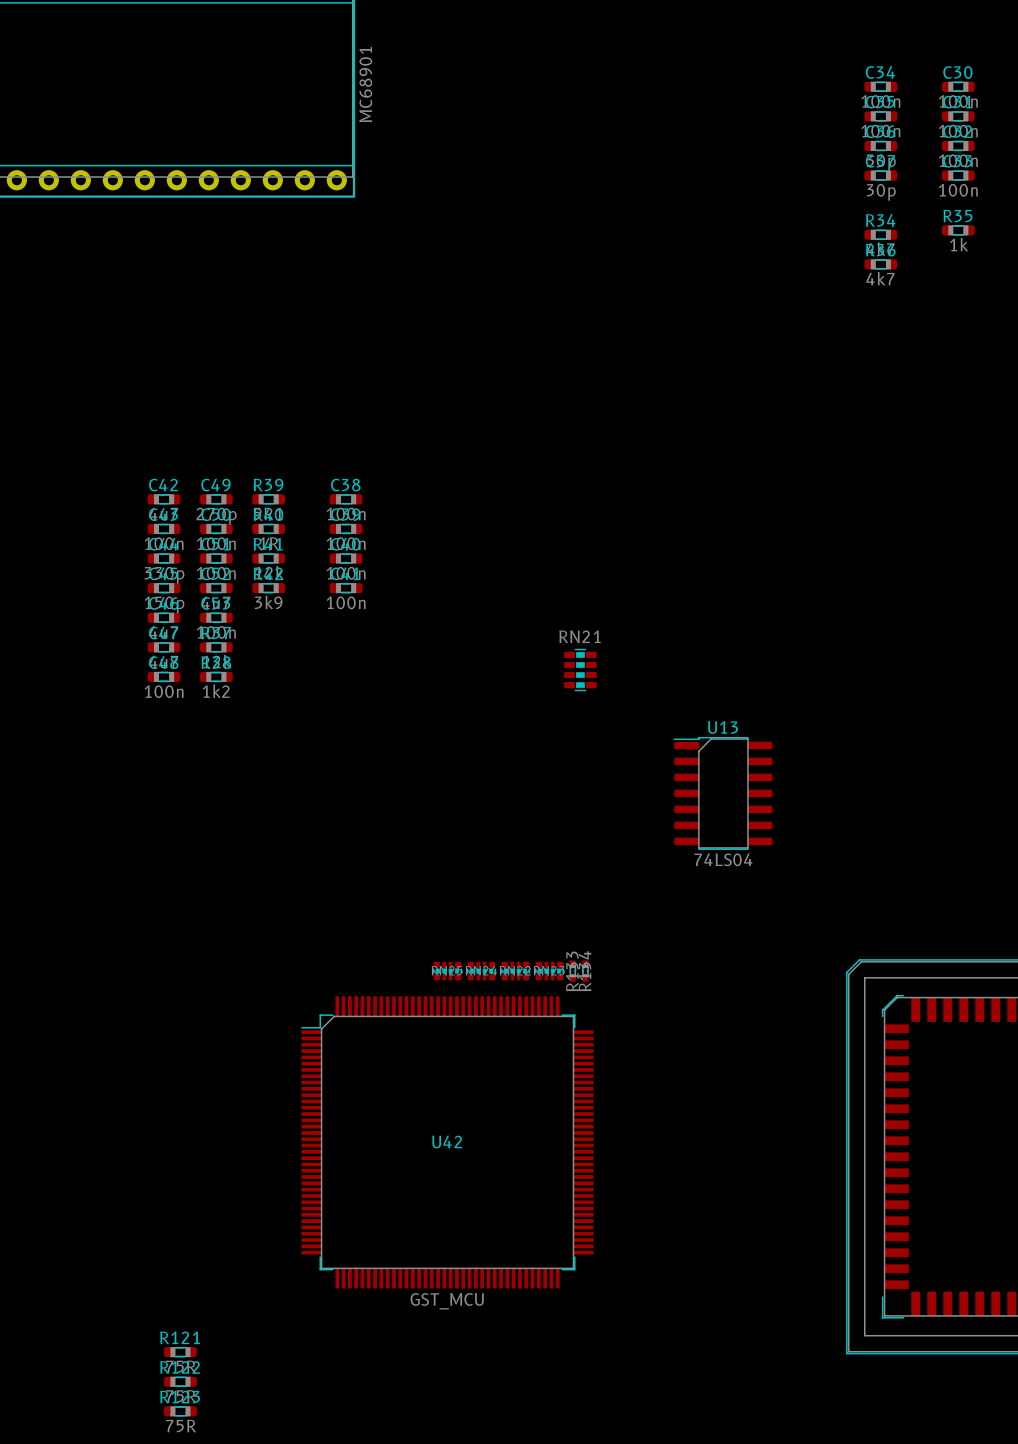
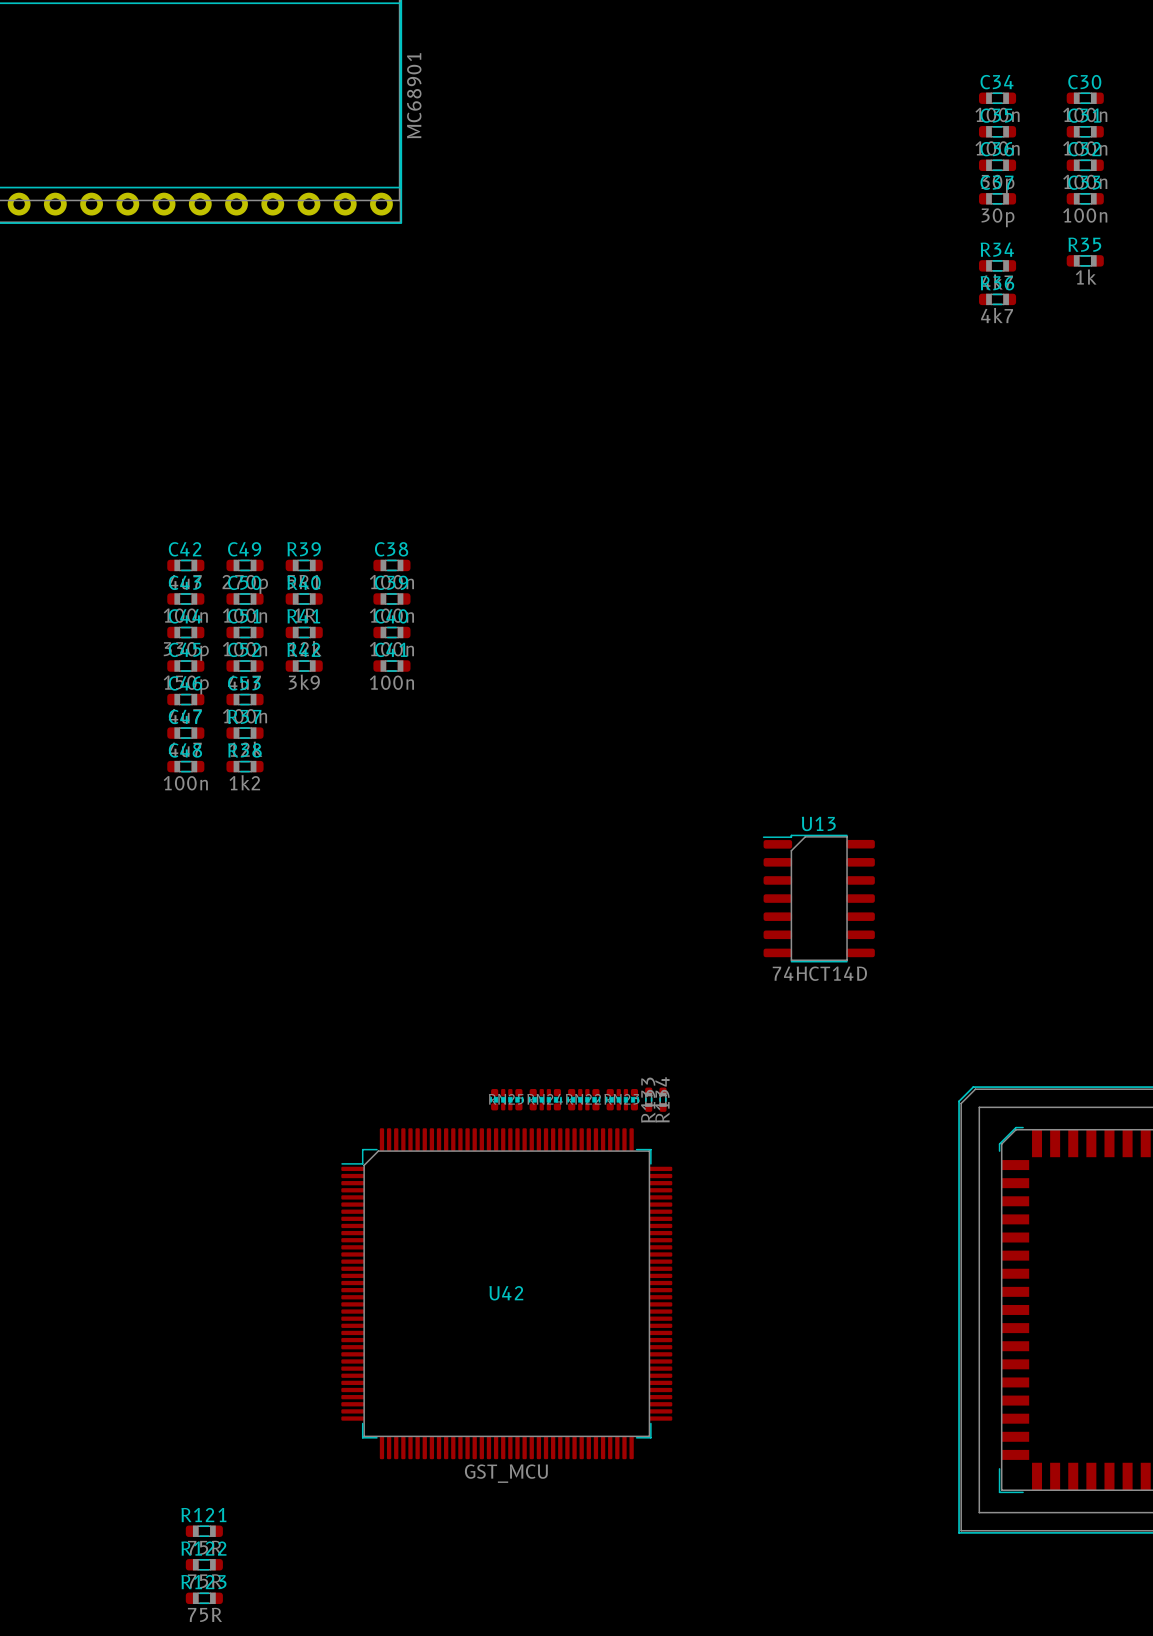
RN21: (580, 670) -> none
U13 value: 74LS04 (723, 859) -> 74HCT14D (819, 973)

